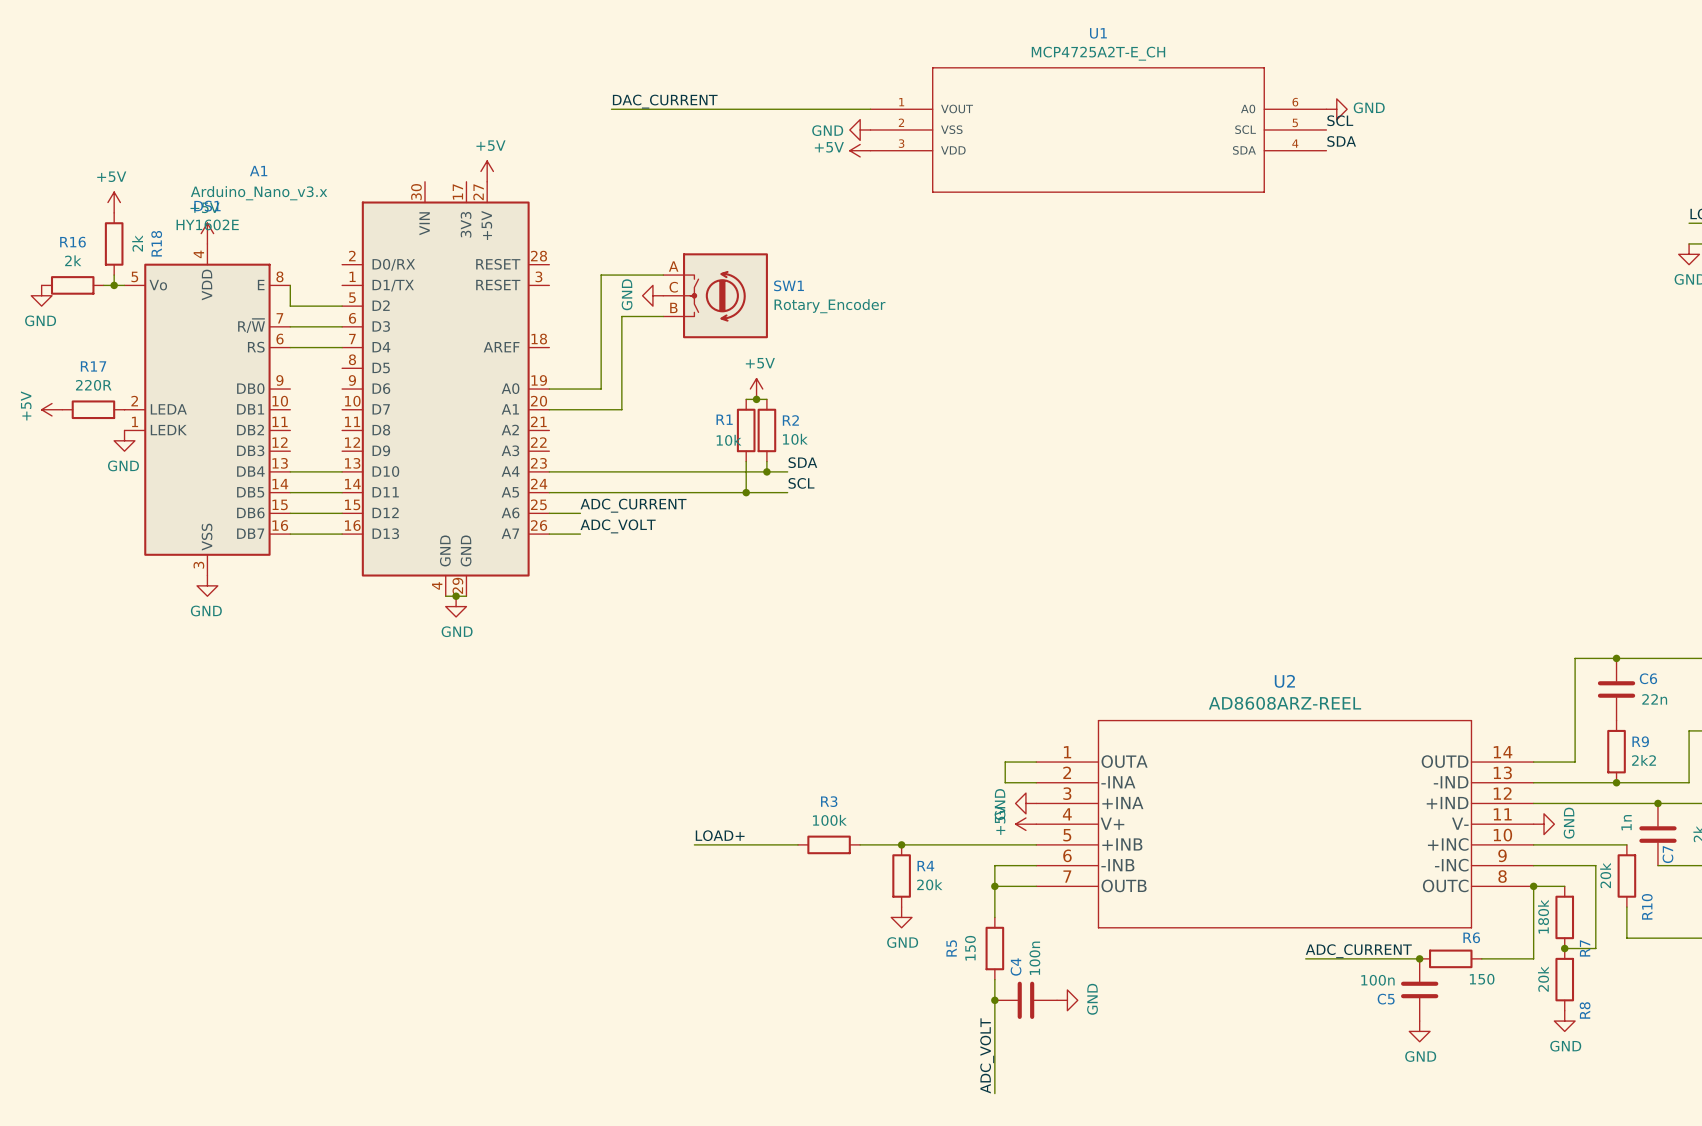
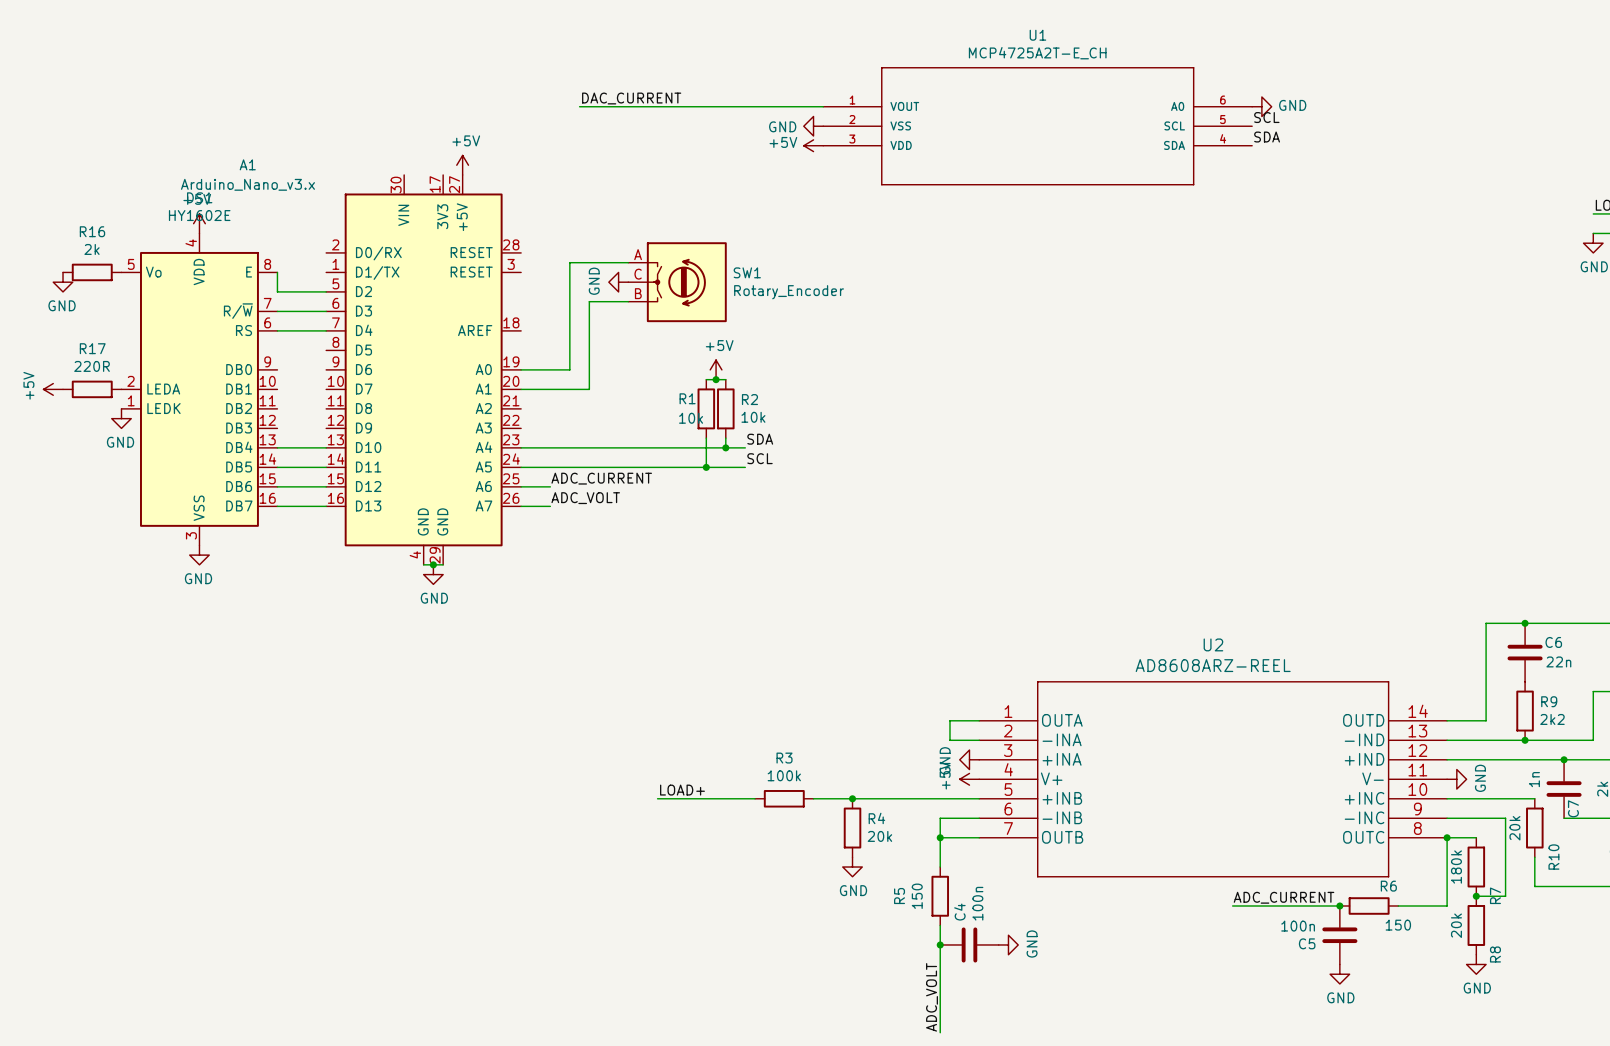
power symbol: +5V (114, 202) -> none
R18: 2k (114, 243) -> none
R16 position: (72, 285) -> (92, 272)
junction: (114, 285) -> none
power symbol position: GND (41, 295) -> GND (63, 282)

